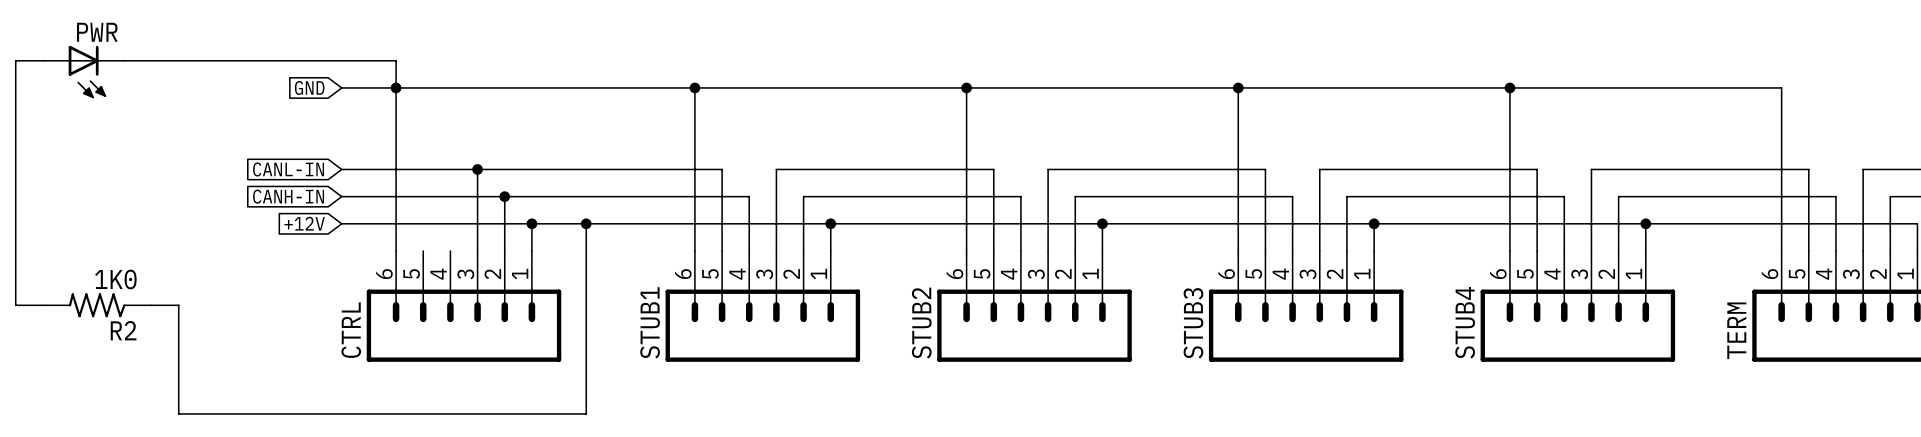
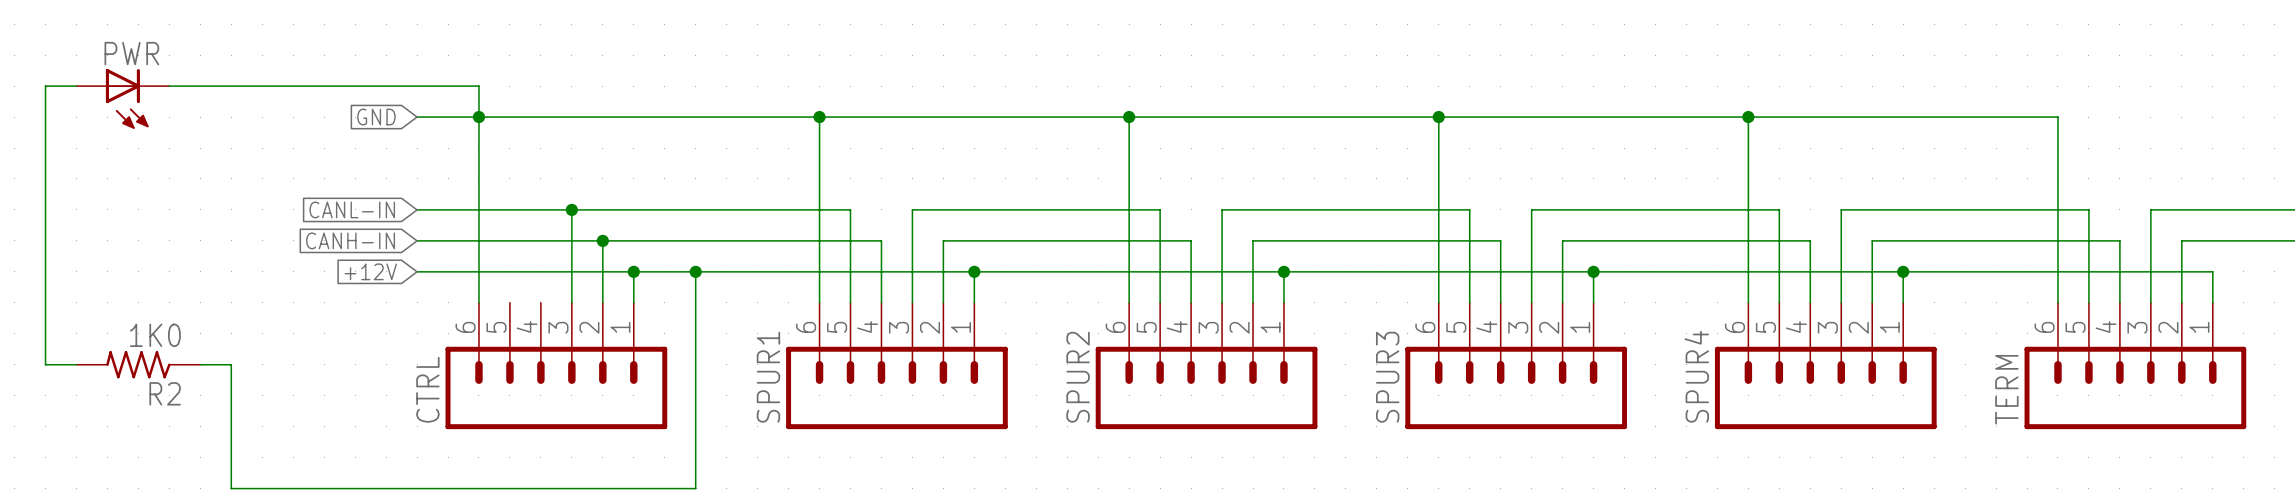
STUB1 name: STUB1 (650, 322) -> SPUR1 (768, 377)
STUB4 name: STUB4 (1465, 322) -> SPUR4 (1696, 376)
STUB2 name: STUB2 (921, 323) -> SPUR2 (1078, 377)
STUB3 name: STUB3 (1193, 323) -> SPUR3 (1387, 377)

